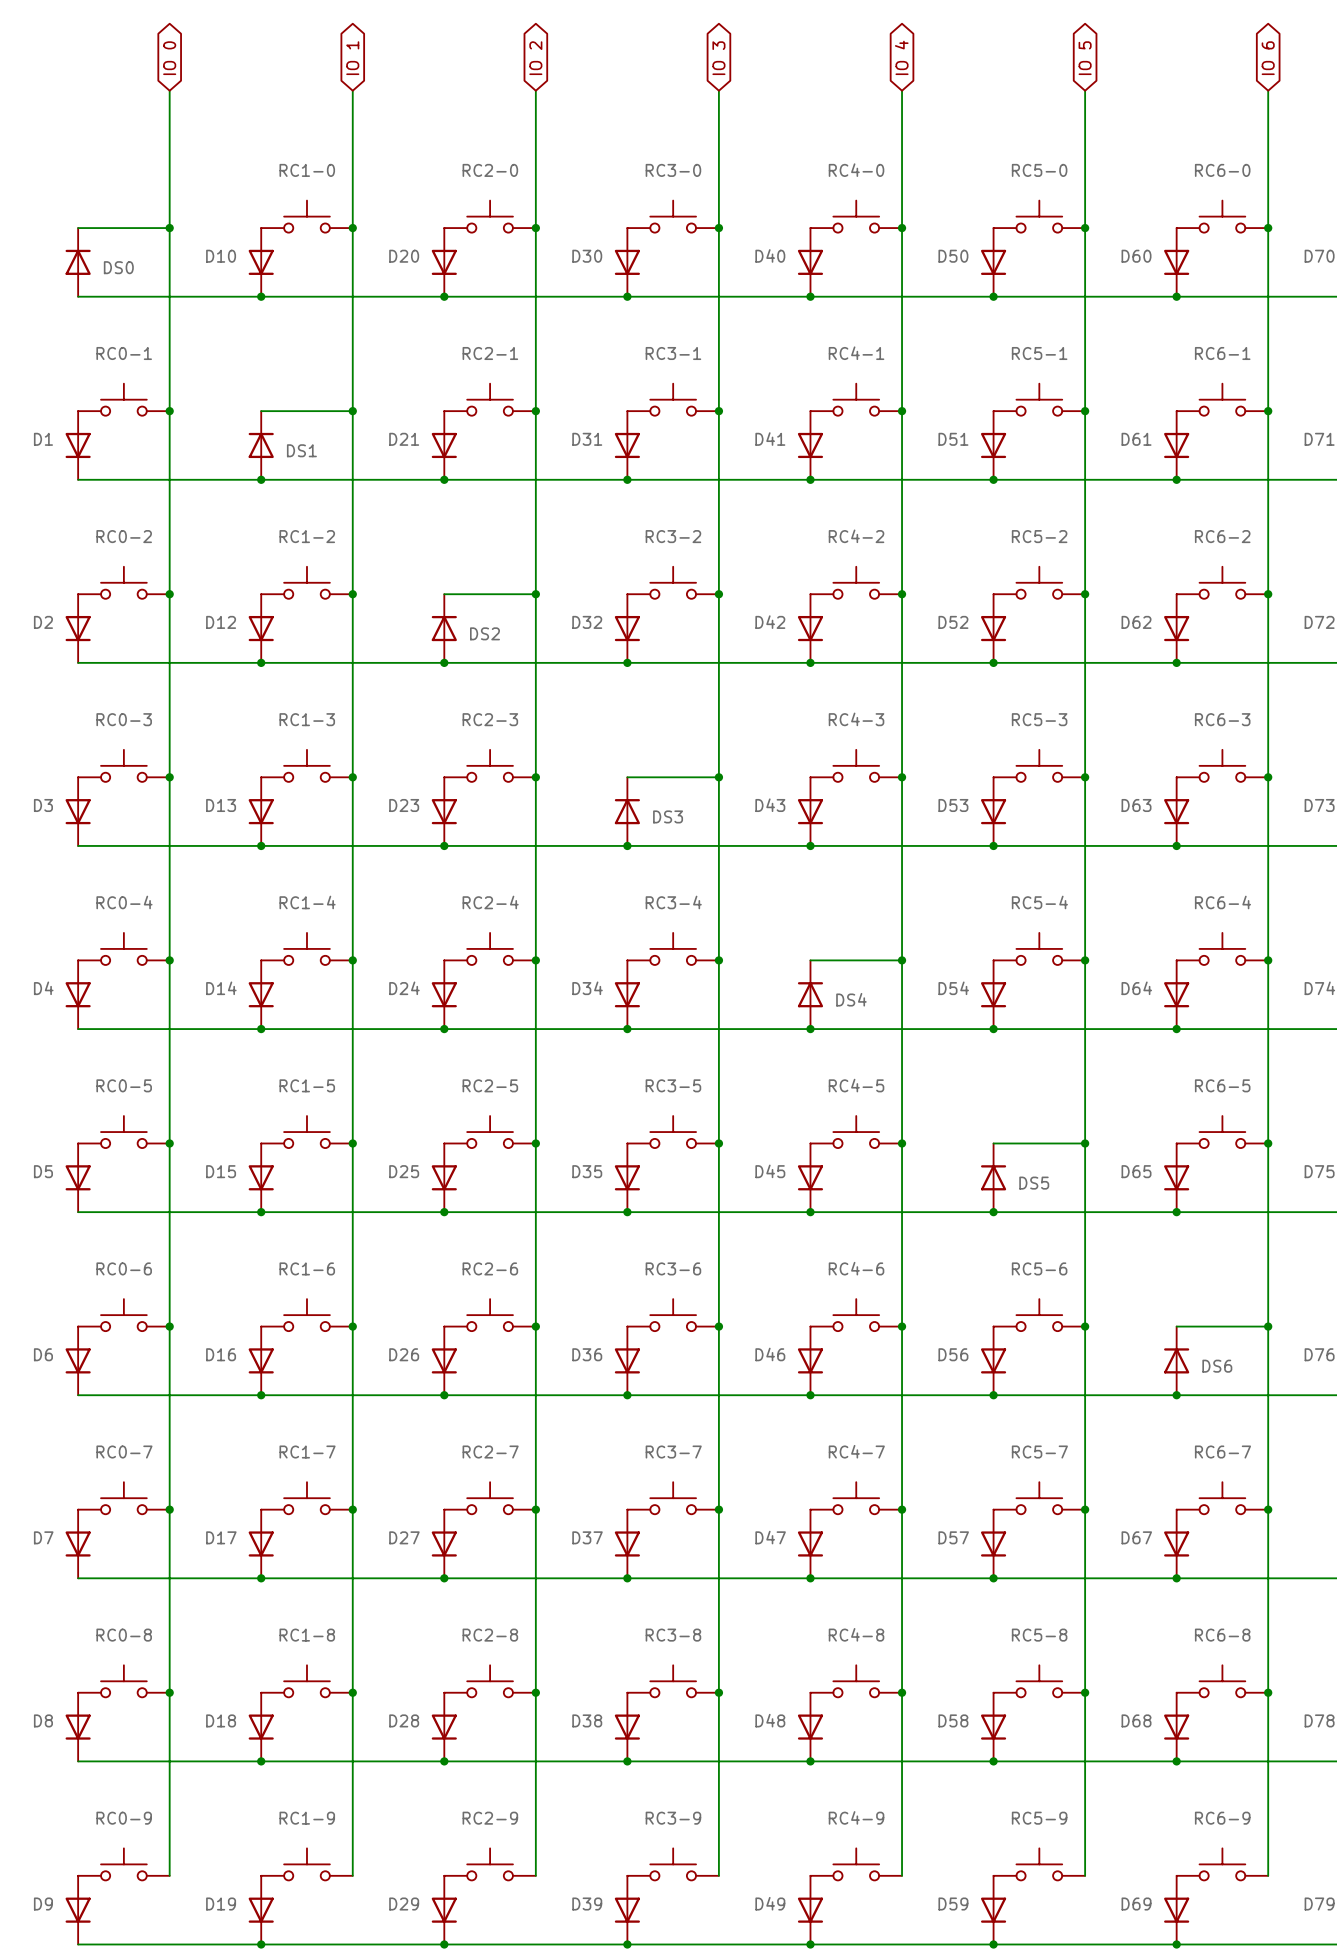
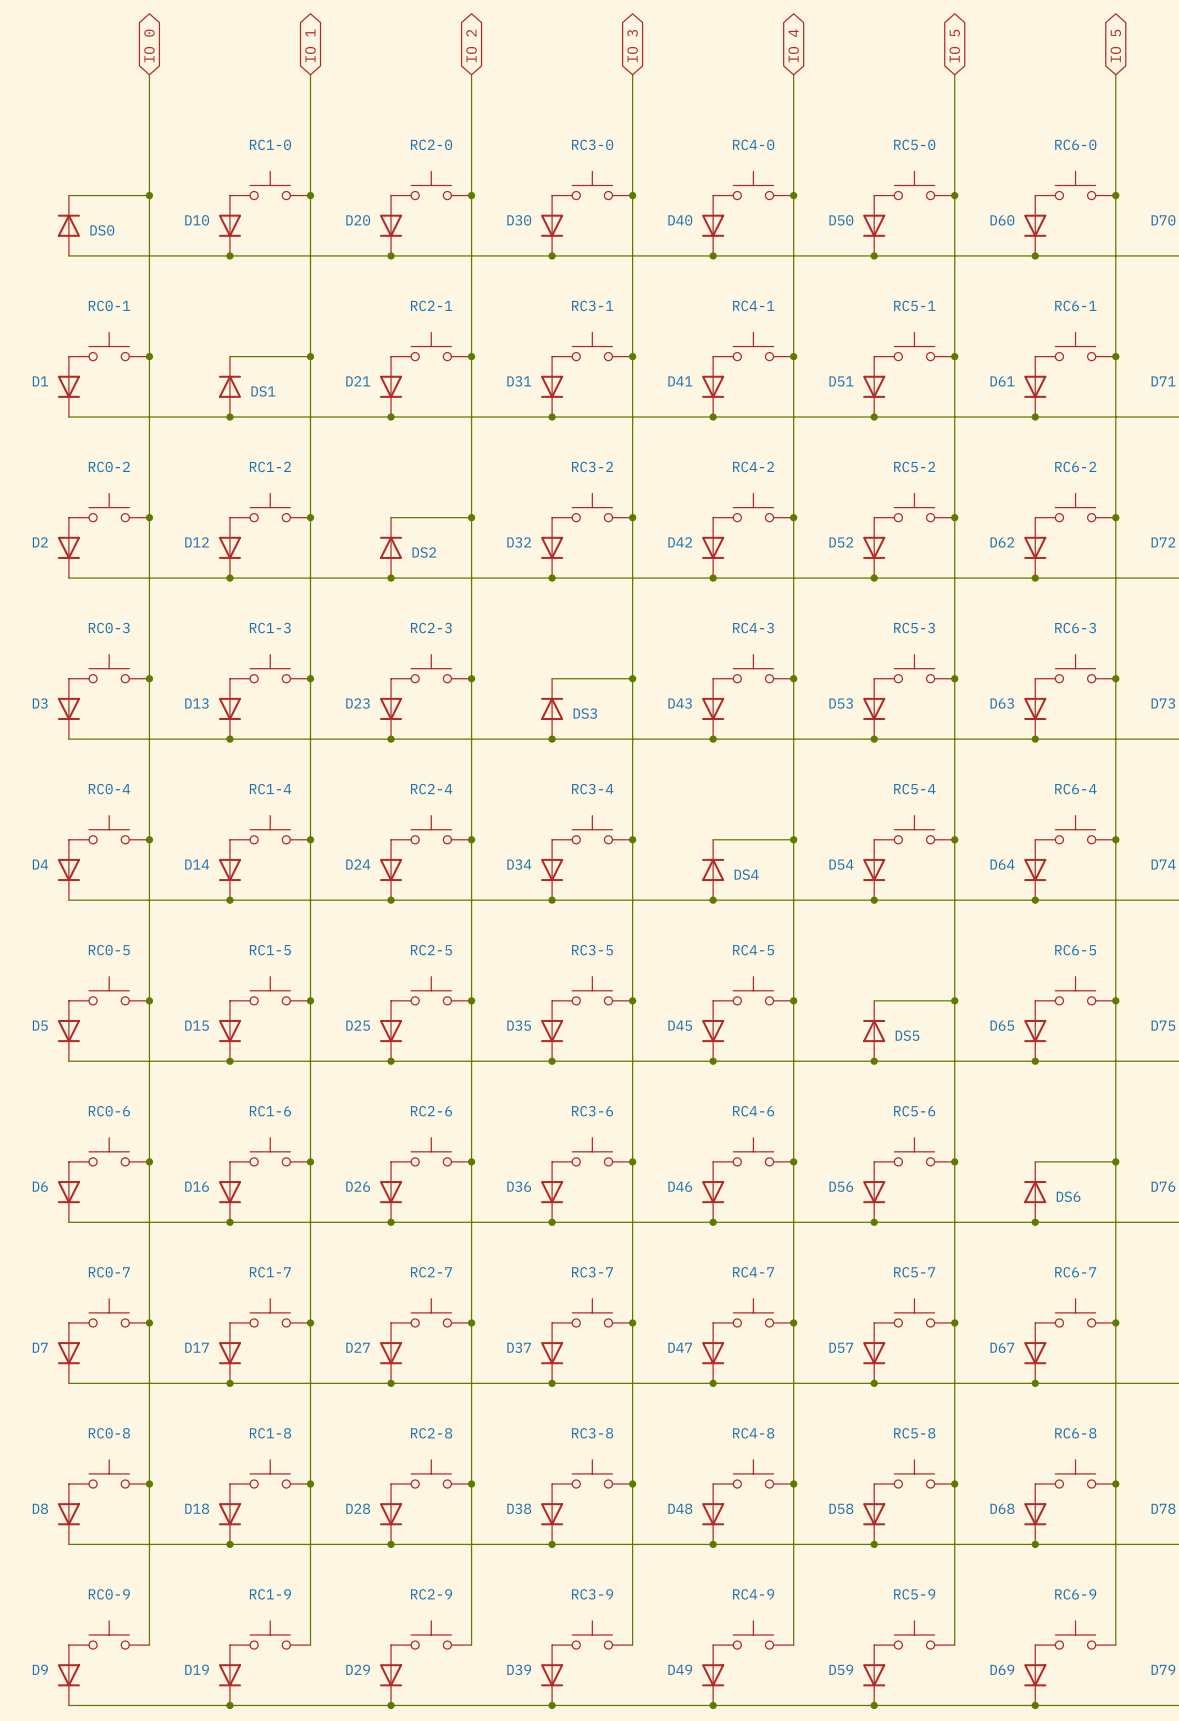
global label: IO 6 (1268, 58) -> IO 5 (1115, 46)

